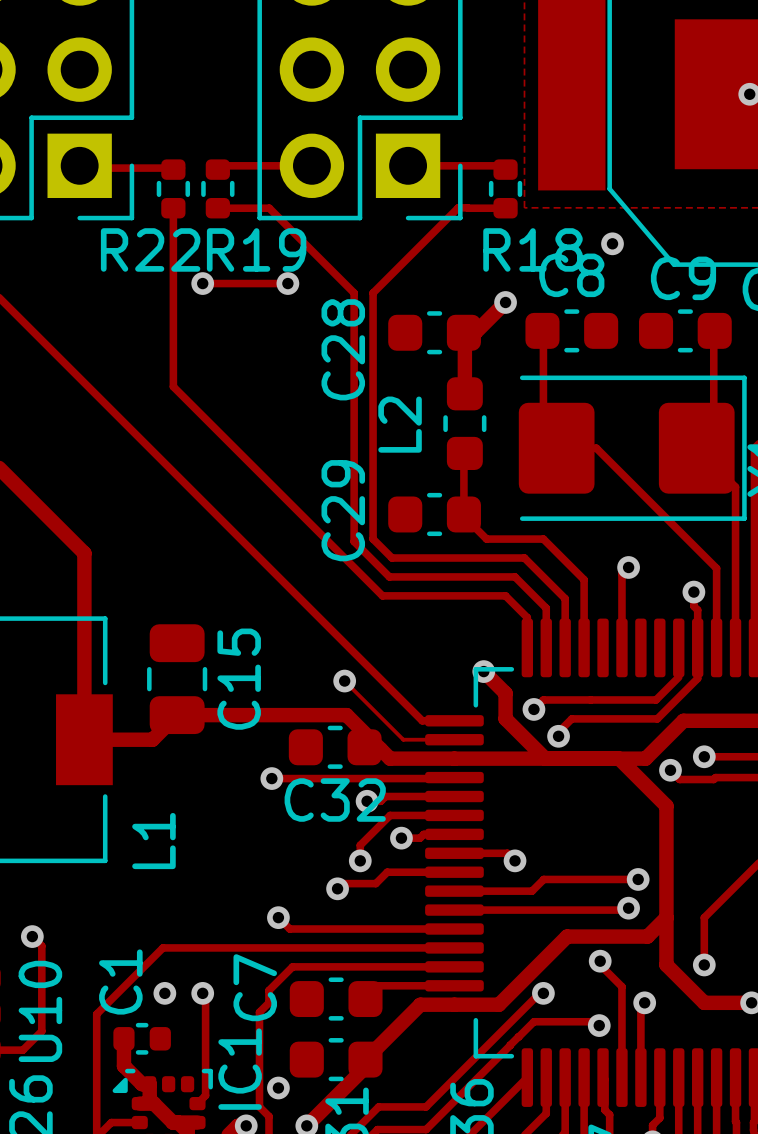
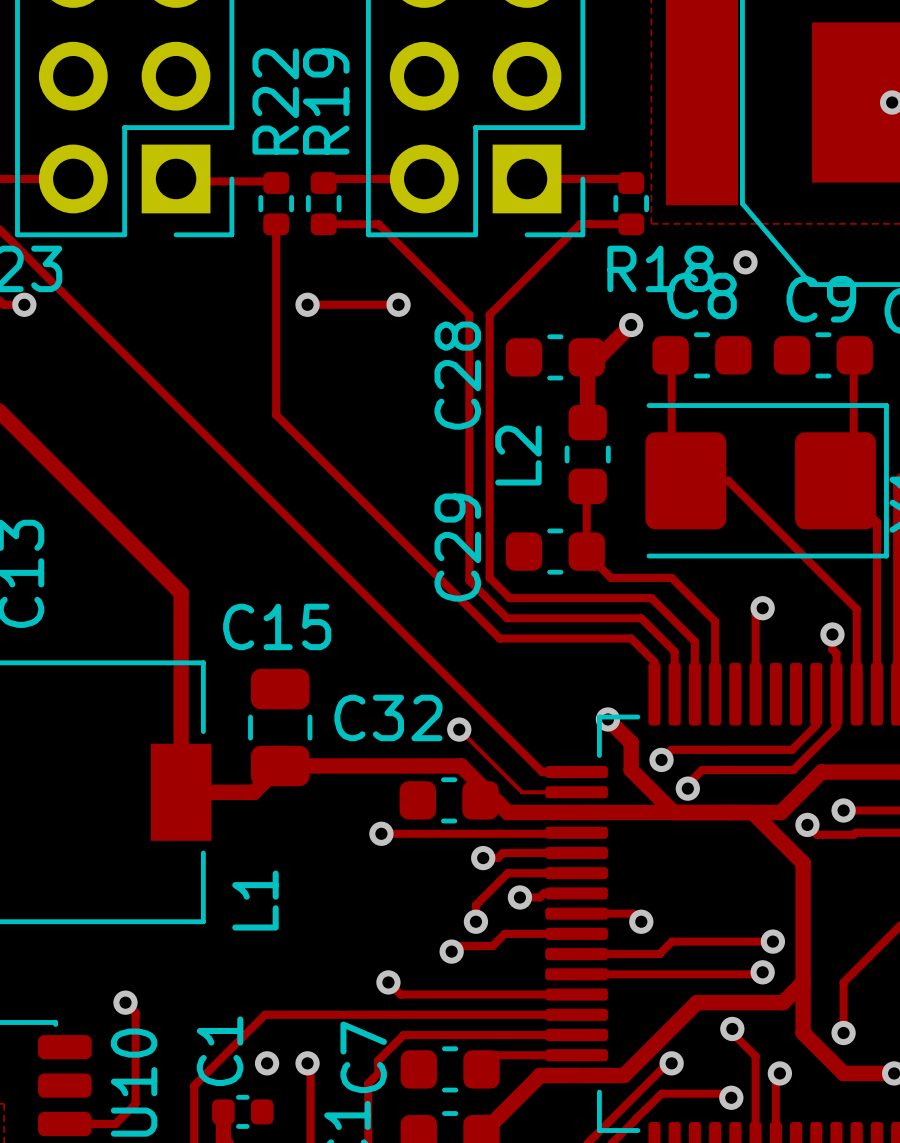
R22 name rotation: 0° (150, 249) -> 90° counterclockwise (275, 101)
R22 name position: R22 (150, 249) -> R22 (275, 101)
R19 name rotation: 0° (256, 249) -> 90° counterclockwise (326, 101)
R19 name position: R19 (256, 249) -> R19 (326, 101)
C15 name rotation: 0° (239, 679) -> 90° clockwise (277, 626)
C32 name position: C32 (335, 800) -> C32 (388, 717)

